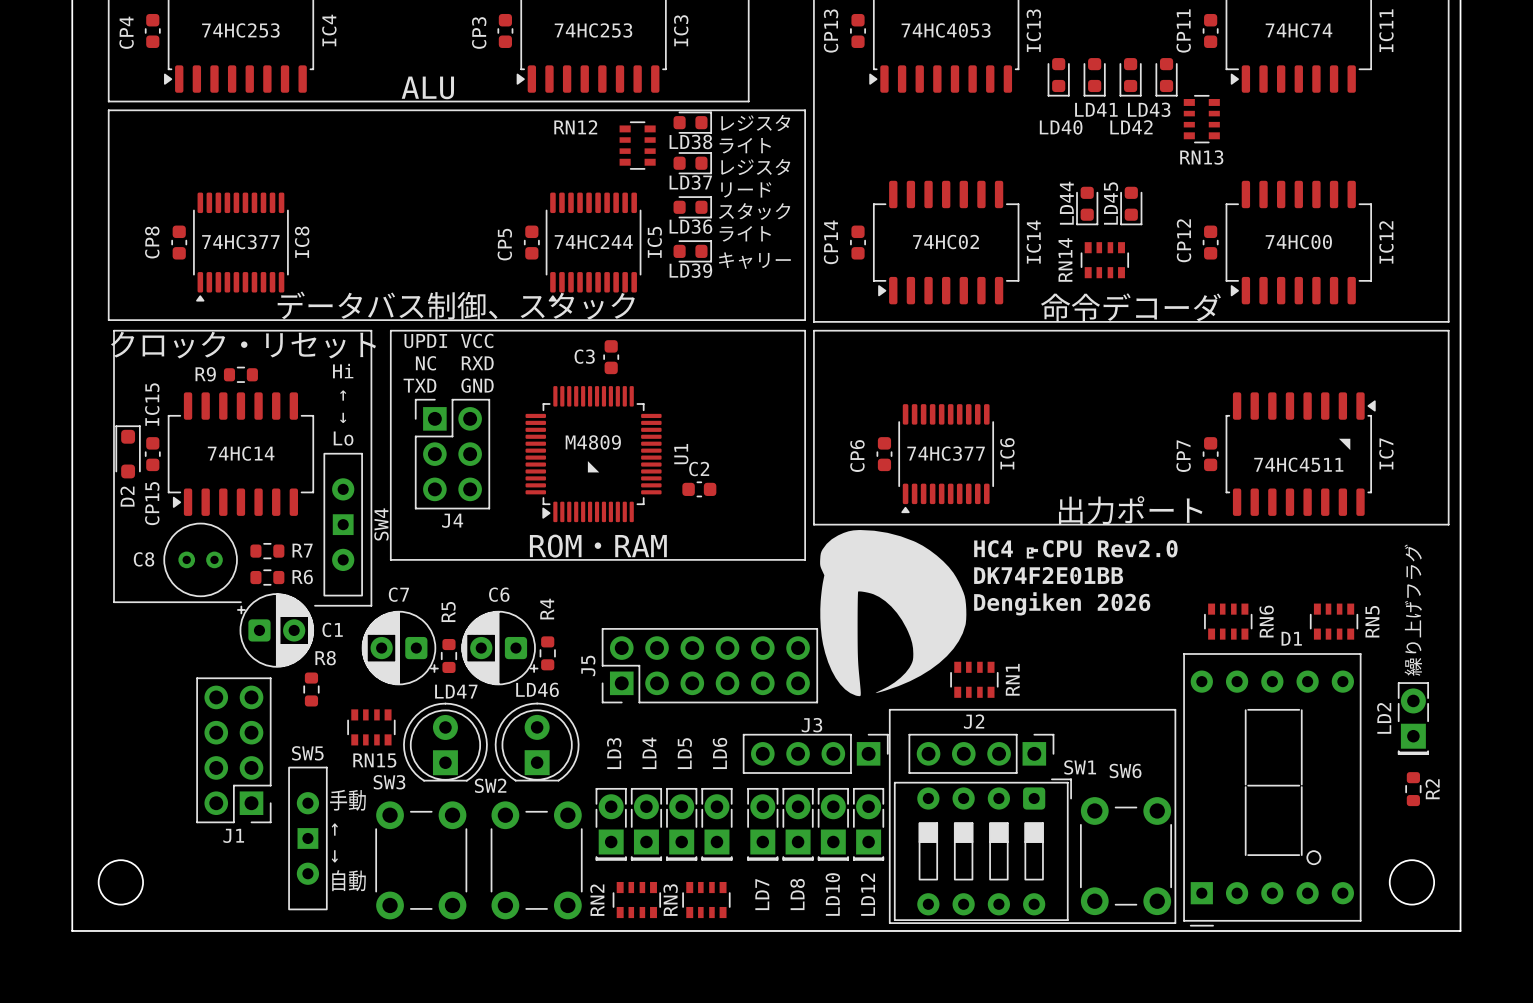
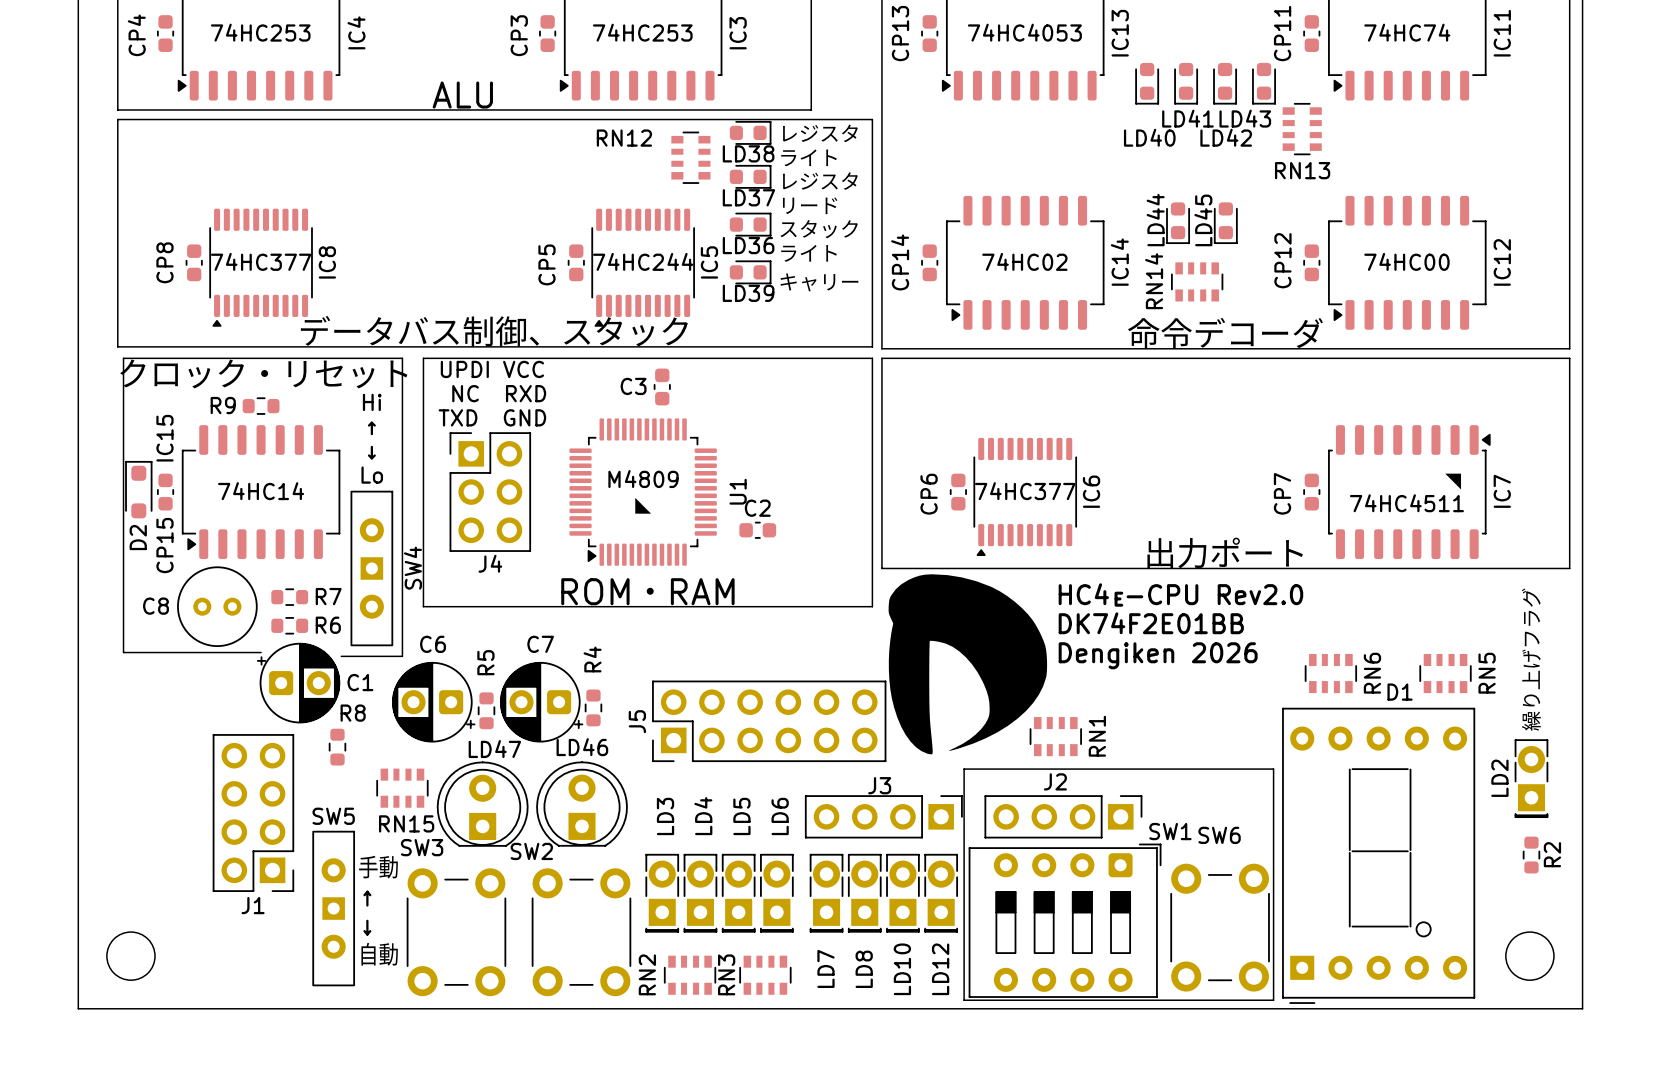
C7 name: C7 (398, 594) -> C6 (433, 644)
C6 name: C6 (499, 594) -> C7 (540, 644)

